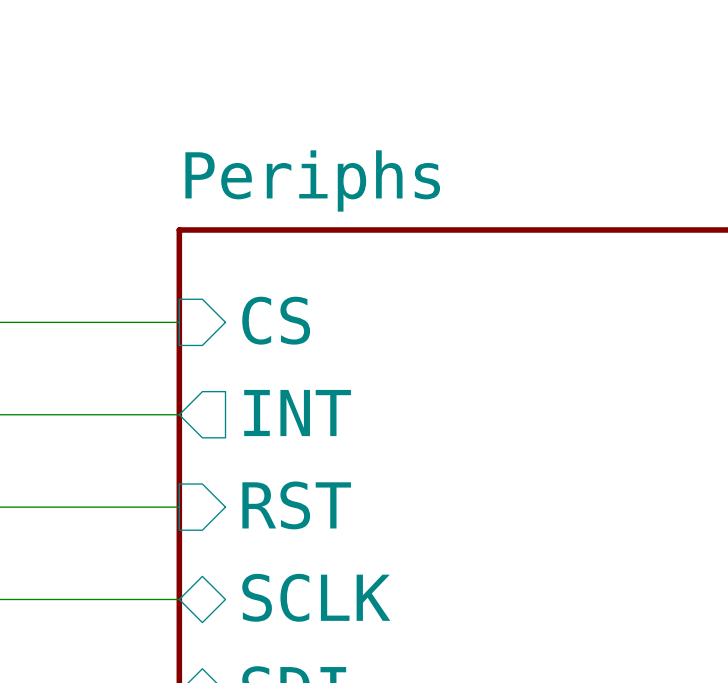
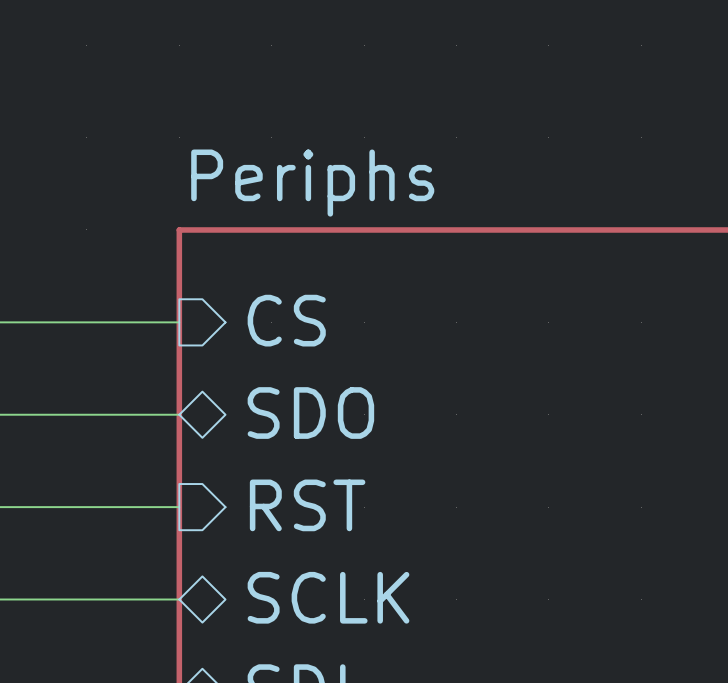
sheet pin shape: output (297, 413) -> bidirectional (310, 413)
sheet pin: INT (297, 413) -> SDO (310, 413)

